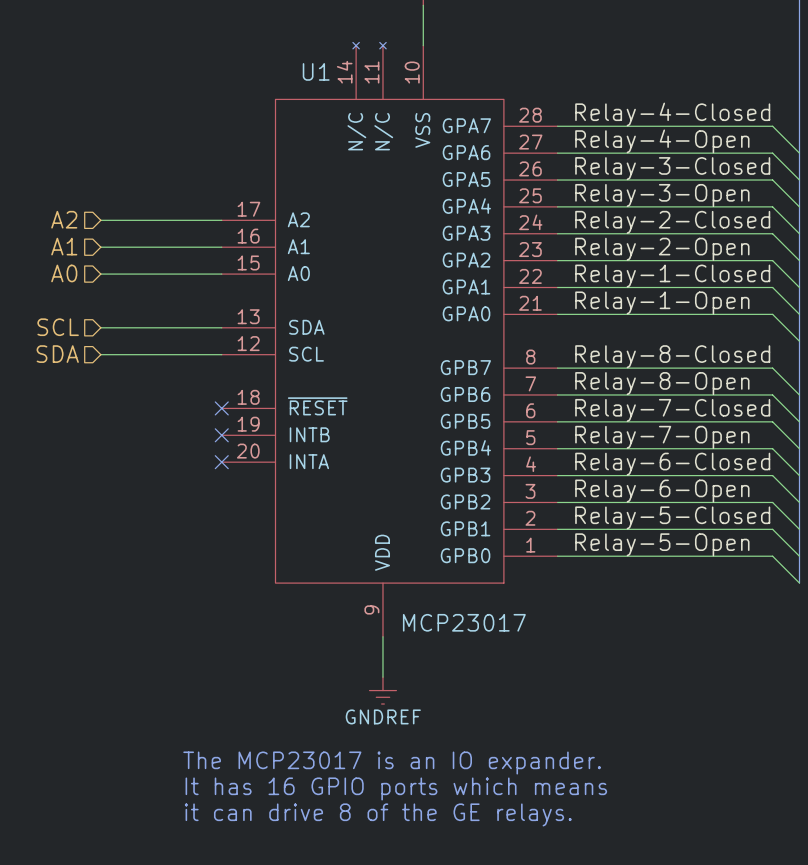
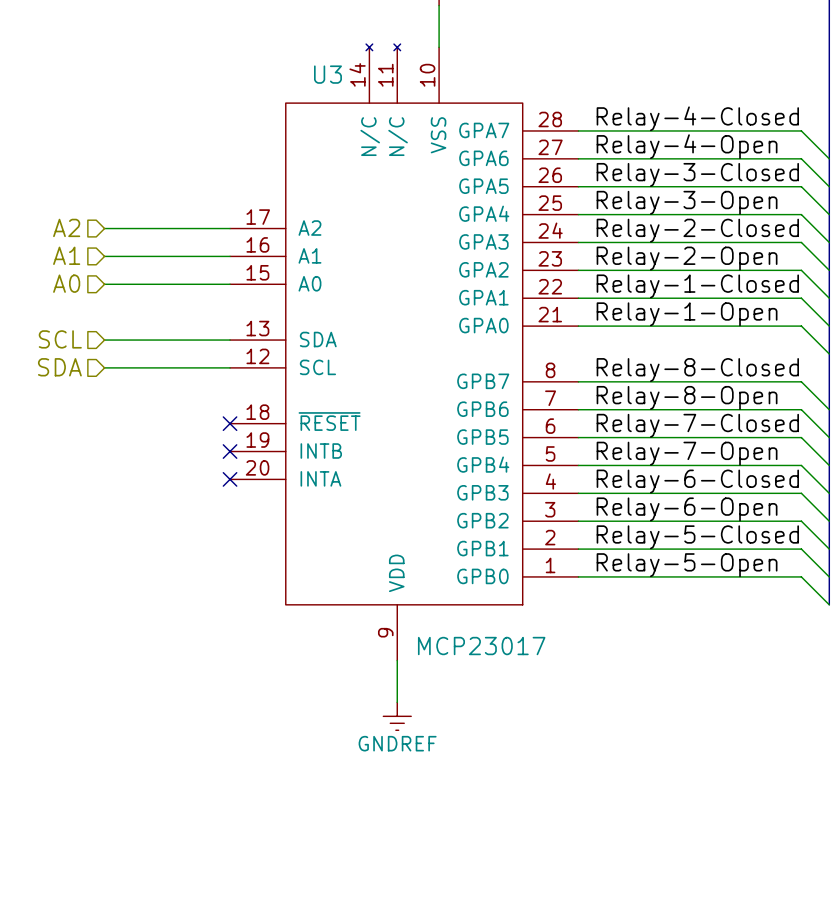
U1 name: U1 (316, 71) -> U3 (327, 74)
text: The MCP23017 is an IO expander. (392, 763) -> none
text: It has 16 GPIO ports which means (396, 788) -> none
text: it can drive 8 of the GE relays. (378, 814) -> none

